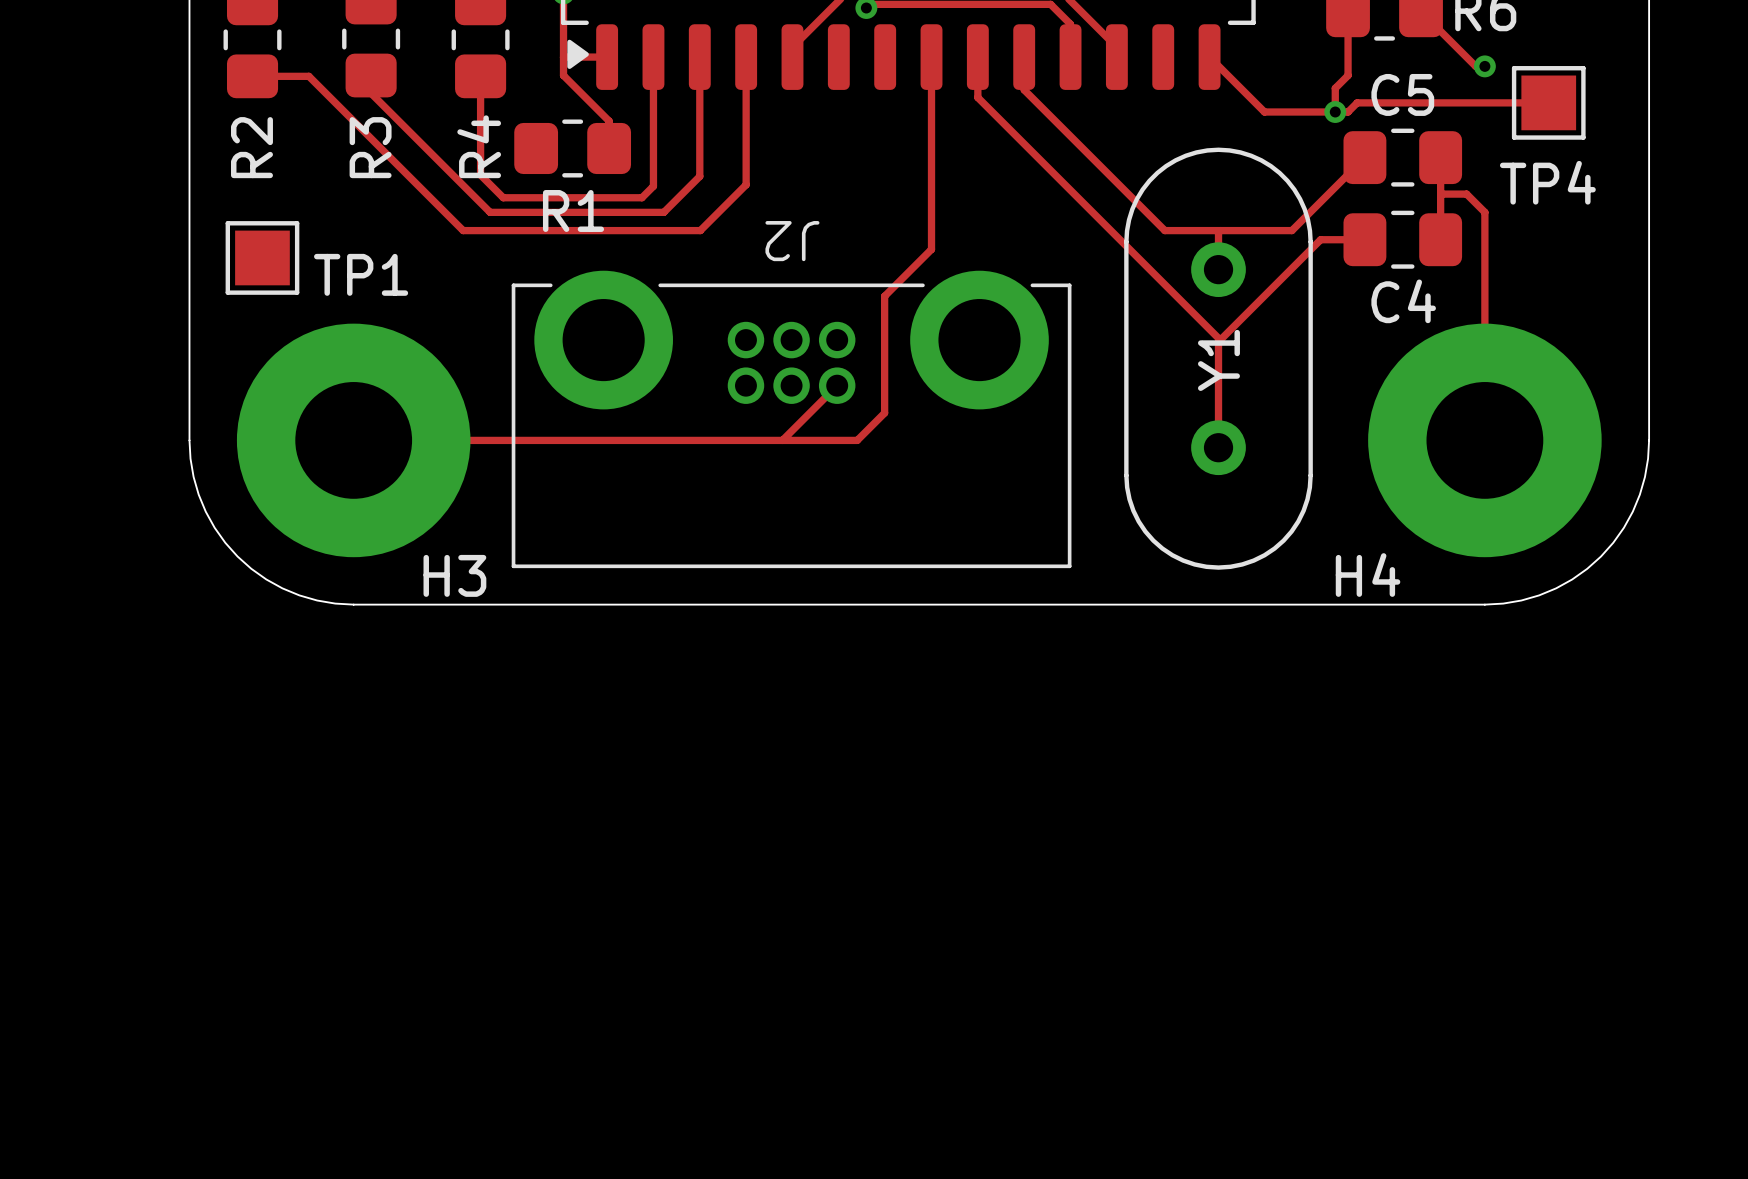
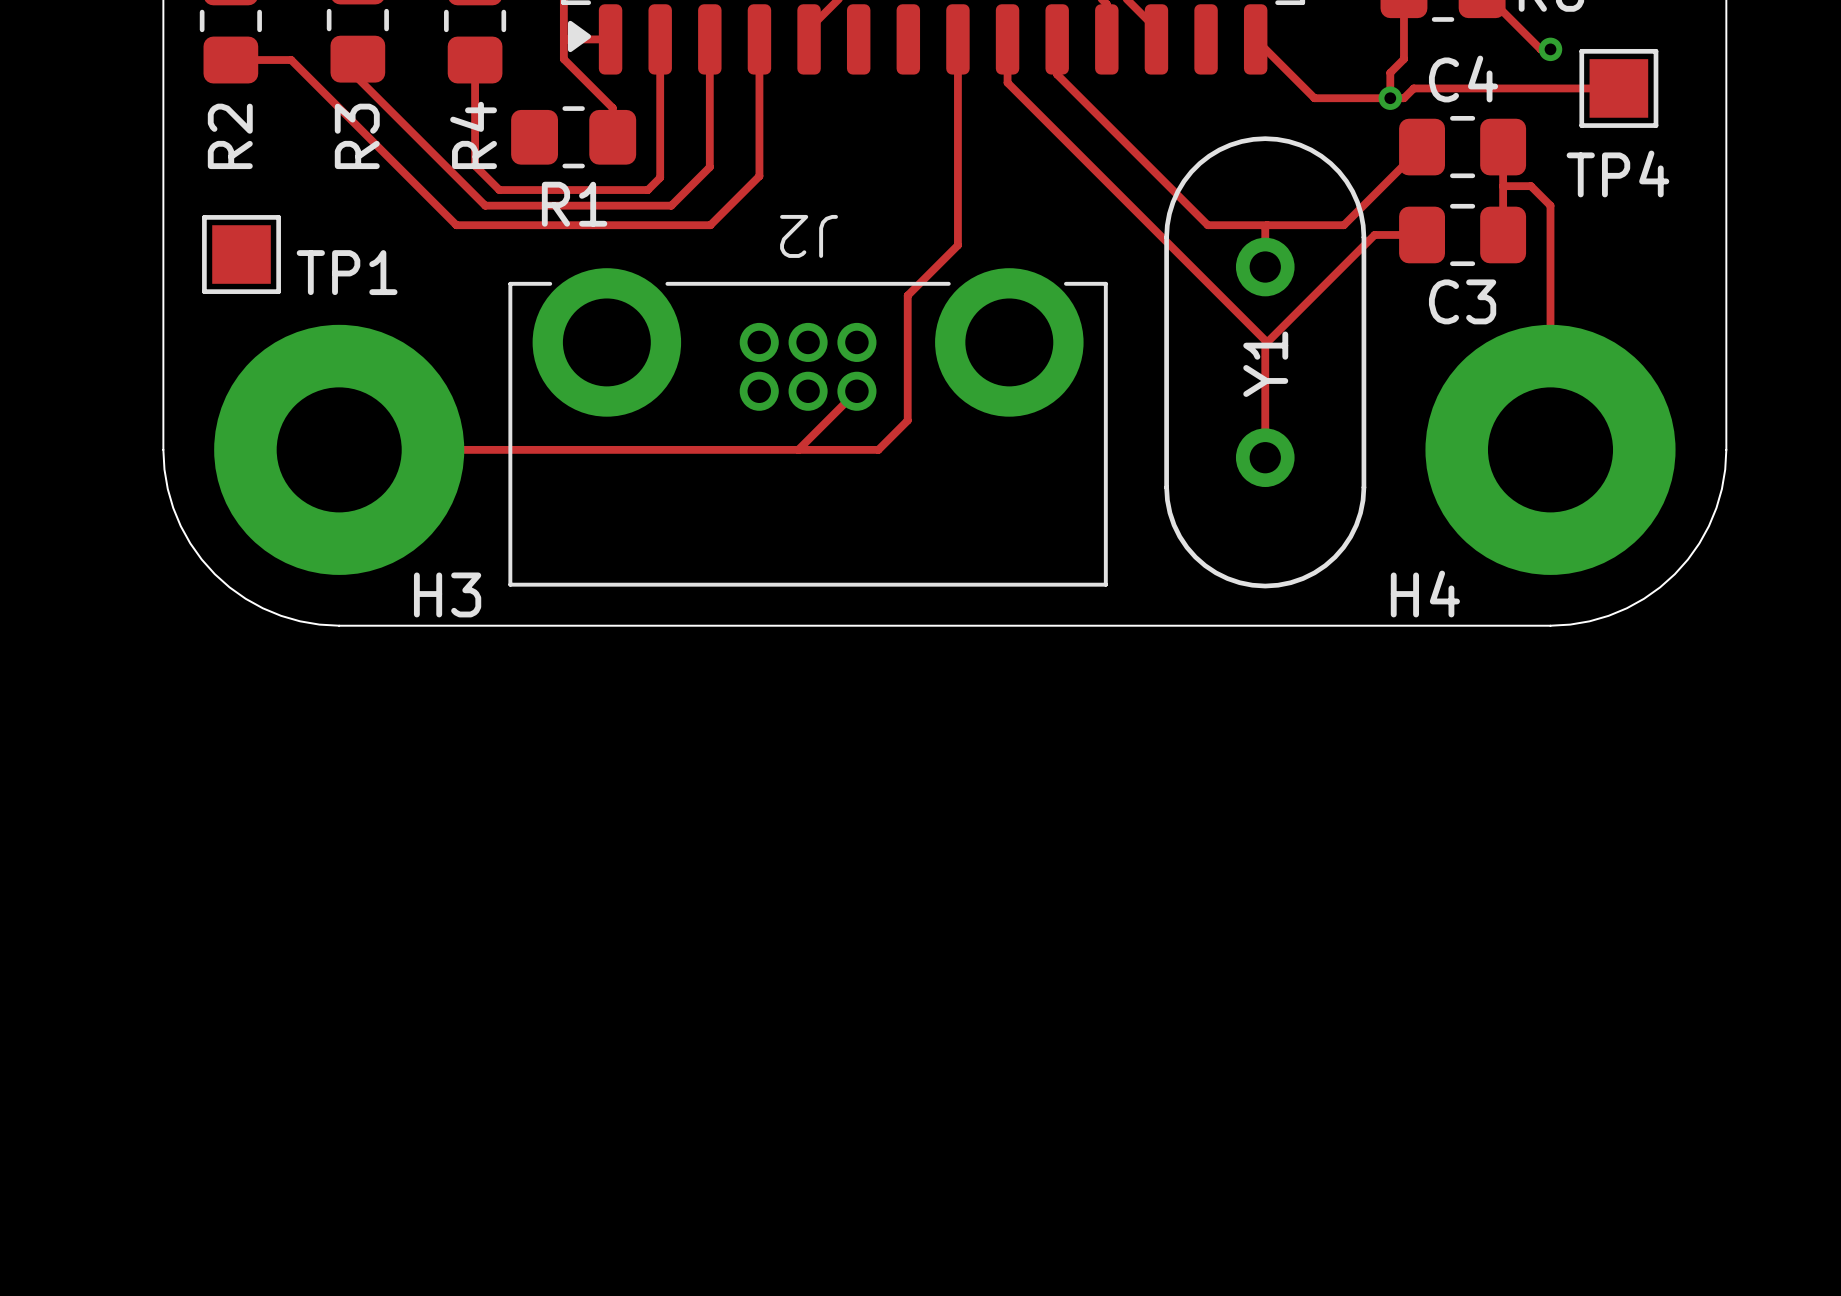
C5 name: C5 (1402, 94) -> C4 (1463, 79)
C4 name: C4 (1403, 301) -> C3 (1462, 301)

